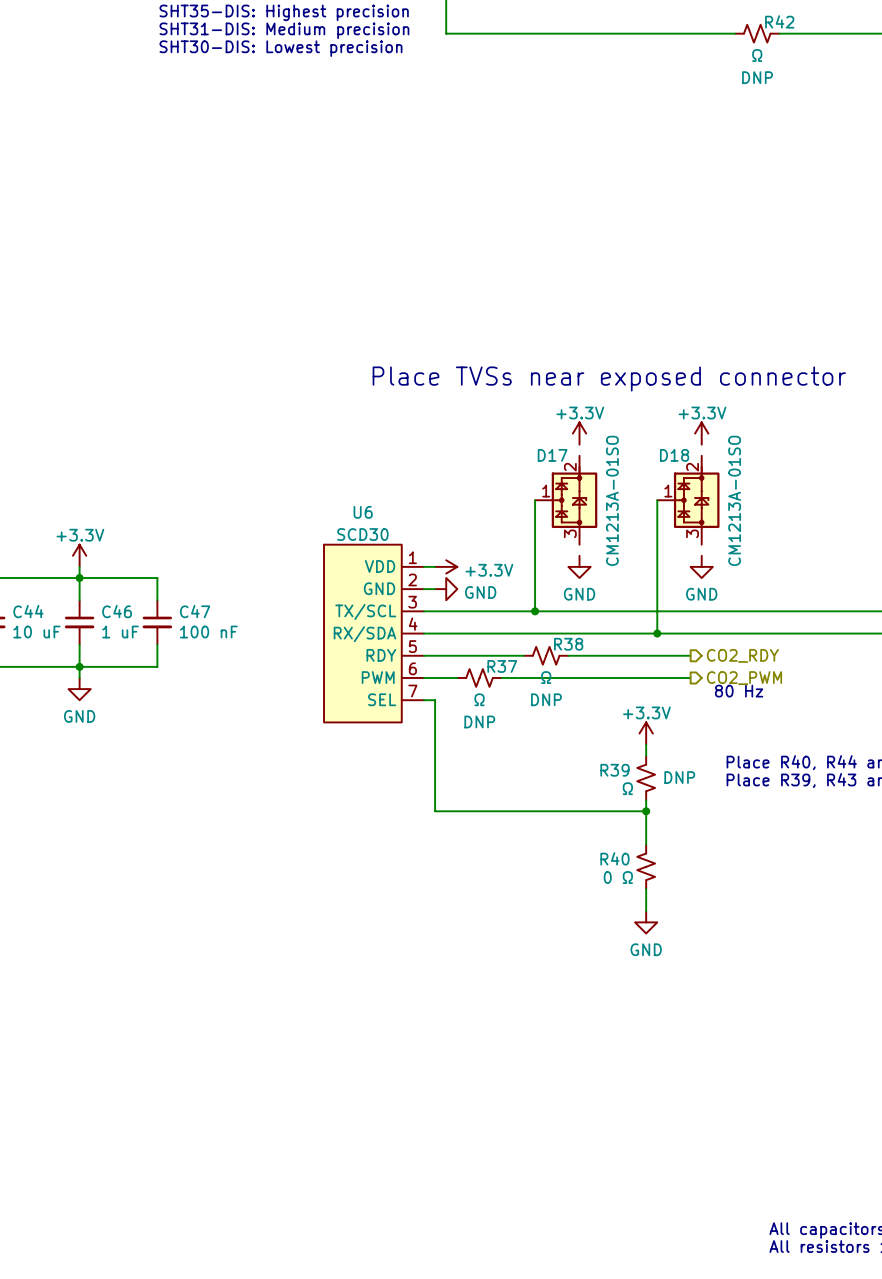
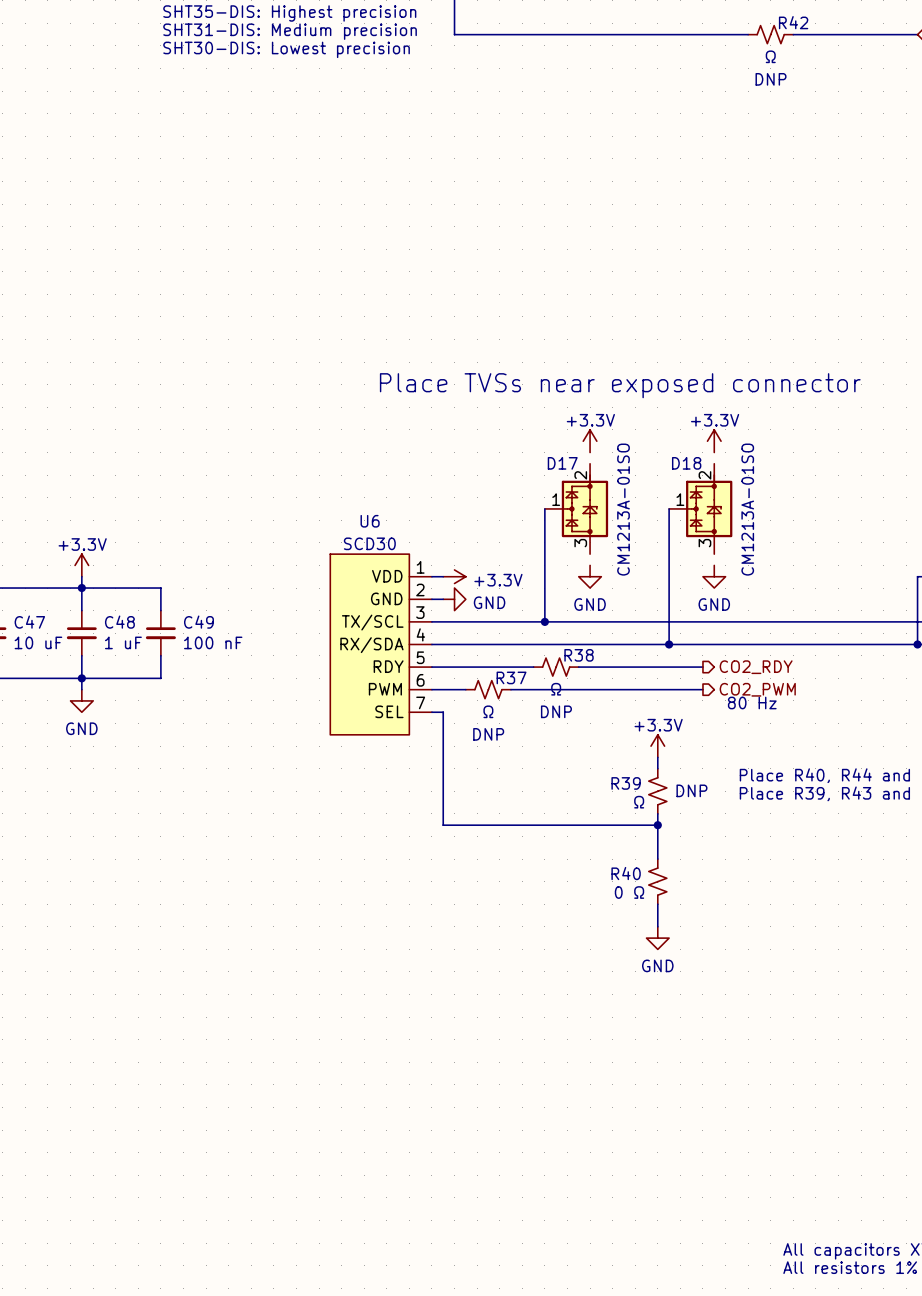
C44 name: C44 (28, 611) -> C47 (29, 622)
C46 name: C46 (117, 611) -> C48 (119, 622)
C47 name: C47 (195, 611) -> C49 (198, 622)

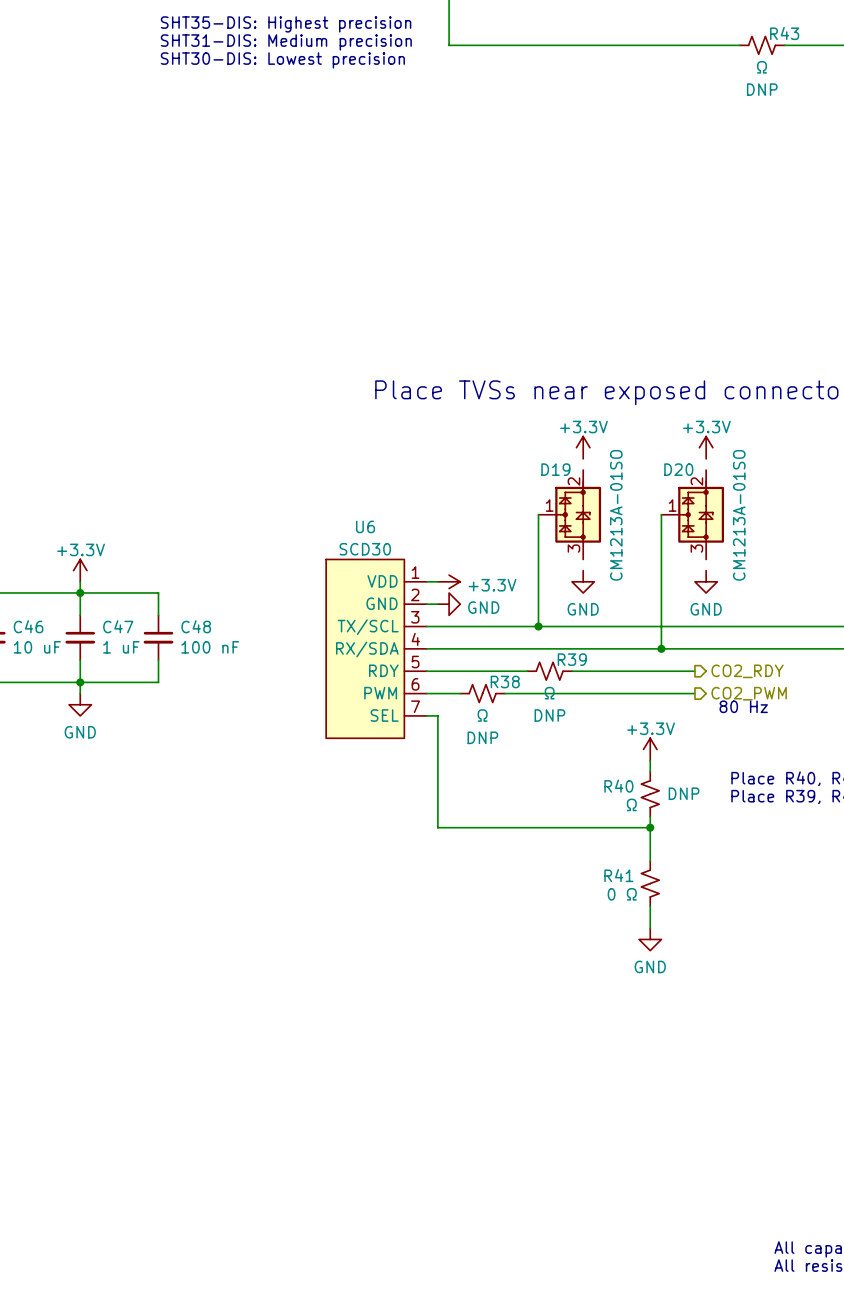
R42 name: R42 (793, 22) -> R43 (784, 33)
D17 name: D17 (562, 463) -> D19 (555, 469)
D18 name: D18 (686, 463) -> D20 (678, 469)
C47 name: C47 (29, 622) -> C46 (28, 626)
C48 name: C48 (119, 622) -> C47 (118, 626)
C49 name: C49 (198, 622) -> C48 (196, 626)
R38 name: R38 (579, 655) -> R39 (572, 659)
R37 name: R37 (511, 677) -> R38 (505, 681)
R39 name: R39 (626, 783) -> R40 (618, 786)
R40 name: R40 (626, 873) -> R41 (618, 875)

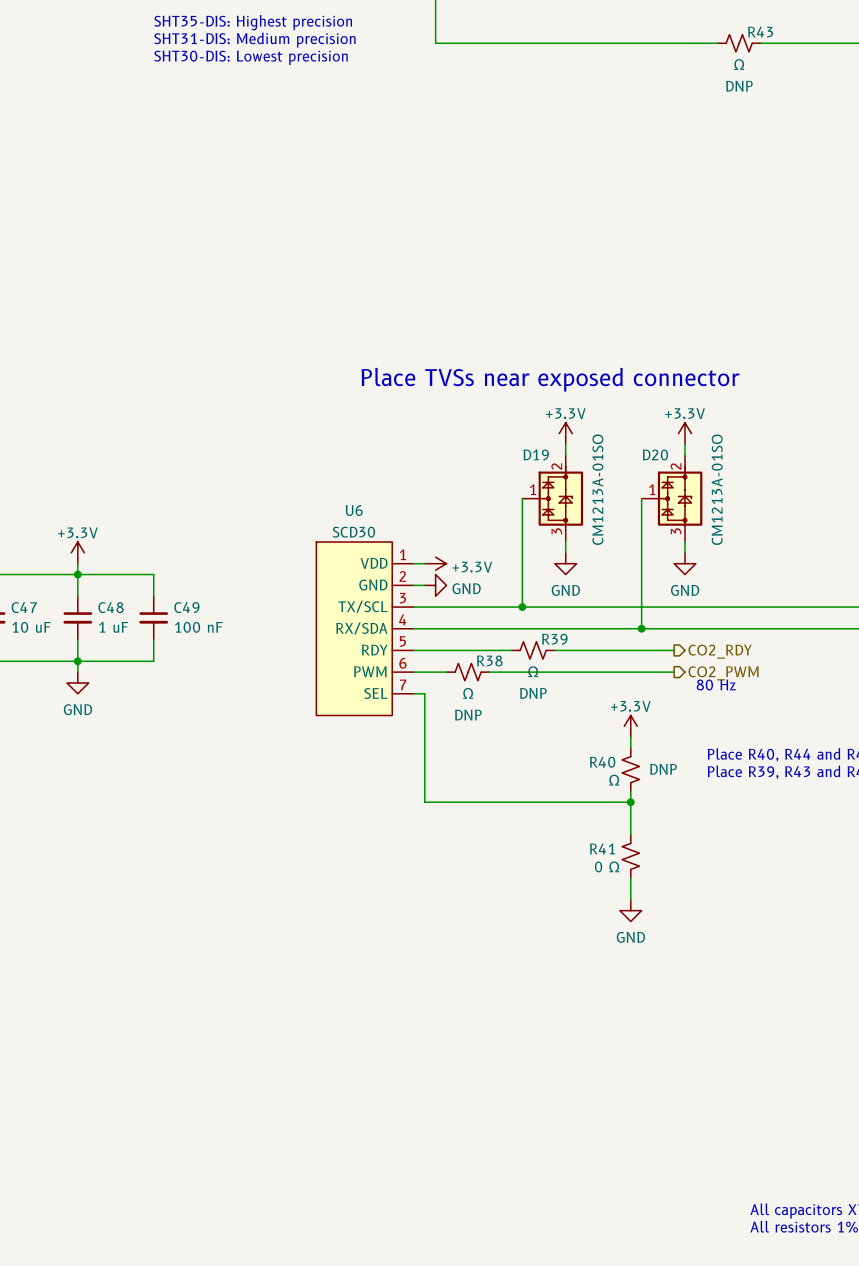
wire: none -> (565, 444) (565, 455)
wire: none -> (684, 444) (684, 455)
wire: none -> (565, 542) (565, 552)
wire: none -> (684, 542) (684, 552)
C46 name: C46 (28, 626) -> C47 (24, 607)
C47 name: C47 (118, 626) -> C48 (111, 607)
C48 name: C48 (196, 626) -> C49 (186, 607)

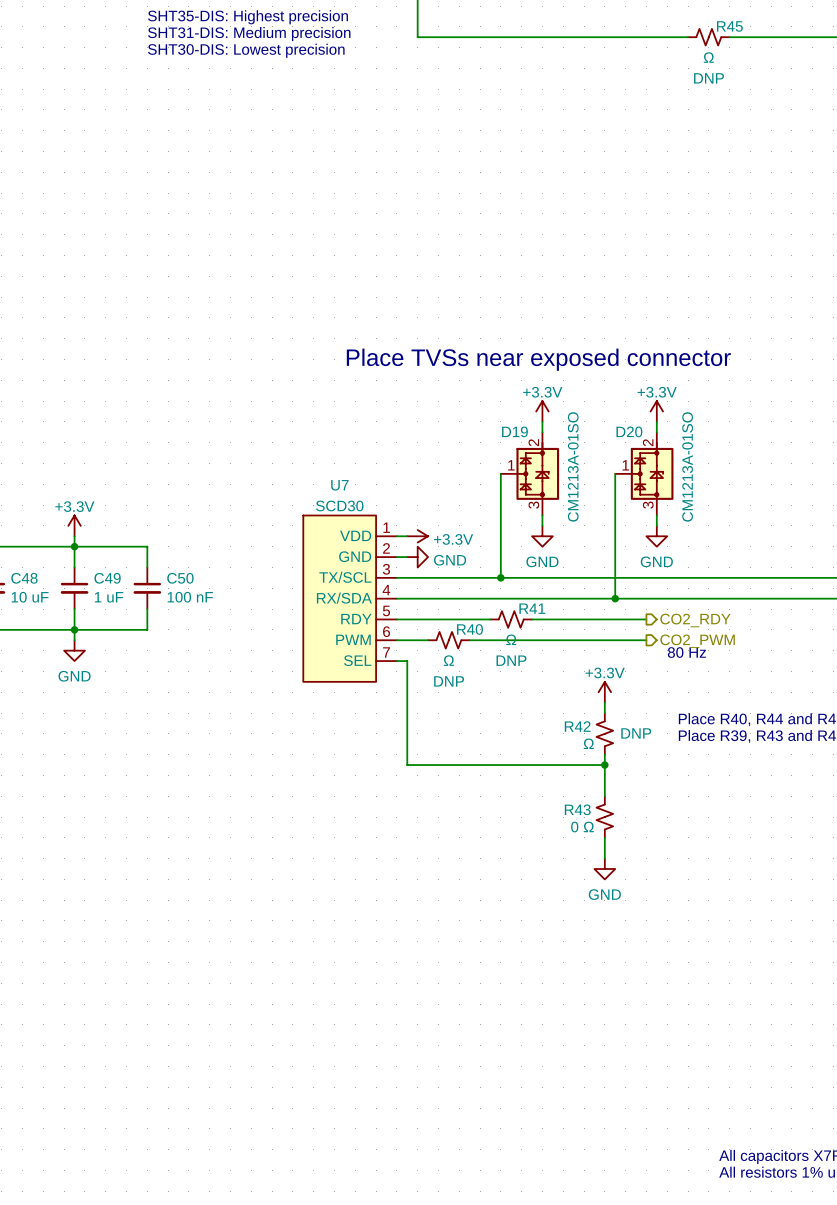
R43 name: R43 (760, 32) -> R45 (729, 26)
U6 name: U6 (354, 510) -> U7 (339, 485)
C47 name: C47 (24, 607) -> C48 (24, 578)
C48 name: C48 (111, 607) -> C49 (107, 578)
C49 name: C49 (186, 607) -> C50 (180, 578)
R39 name: R39 (554, 639) -> R41 (532, 608)
R38 name: R38 (489, 660) -> R40 (469, 629)
R40 name: R40 (602, 762) -> R42 (577, 726)
R41 name: R41 (602, 848) -> R43 (577, 809)

